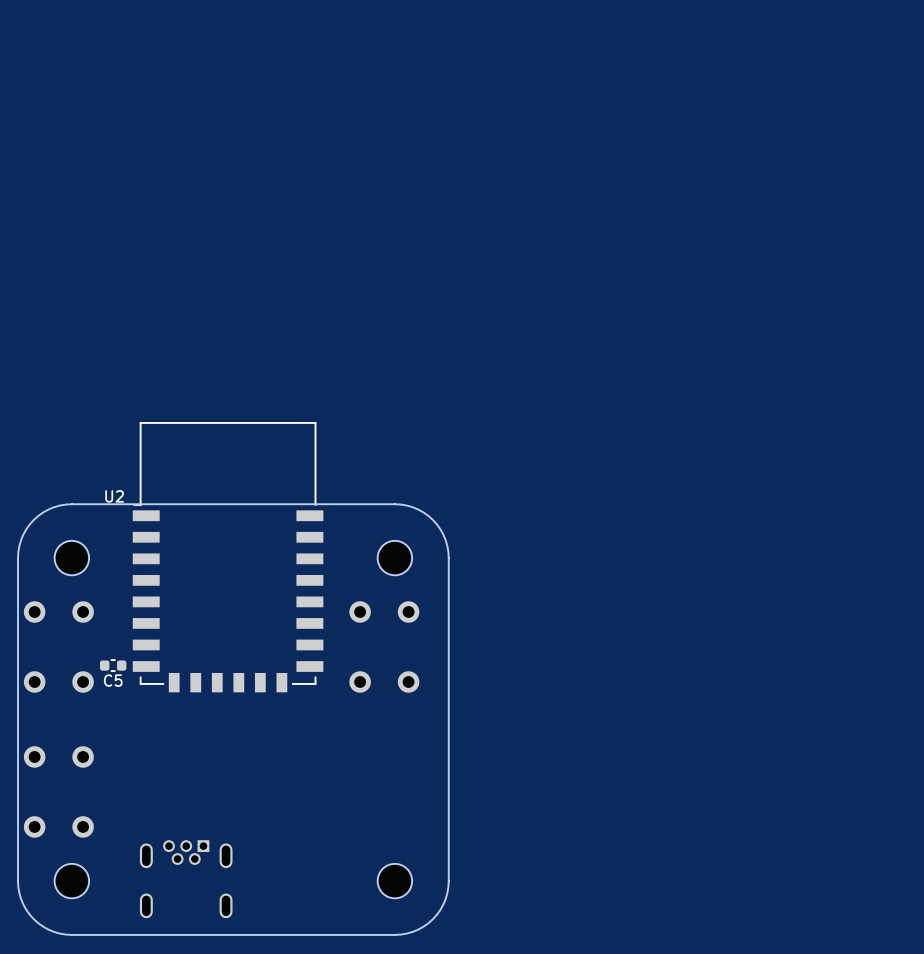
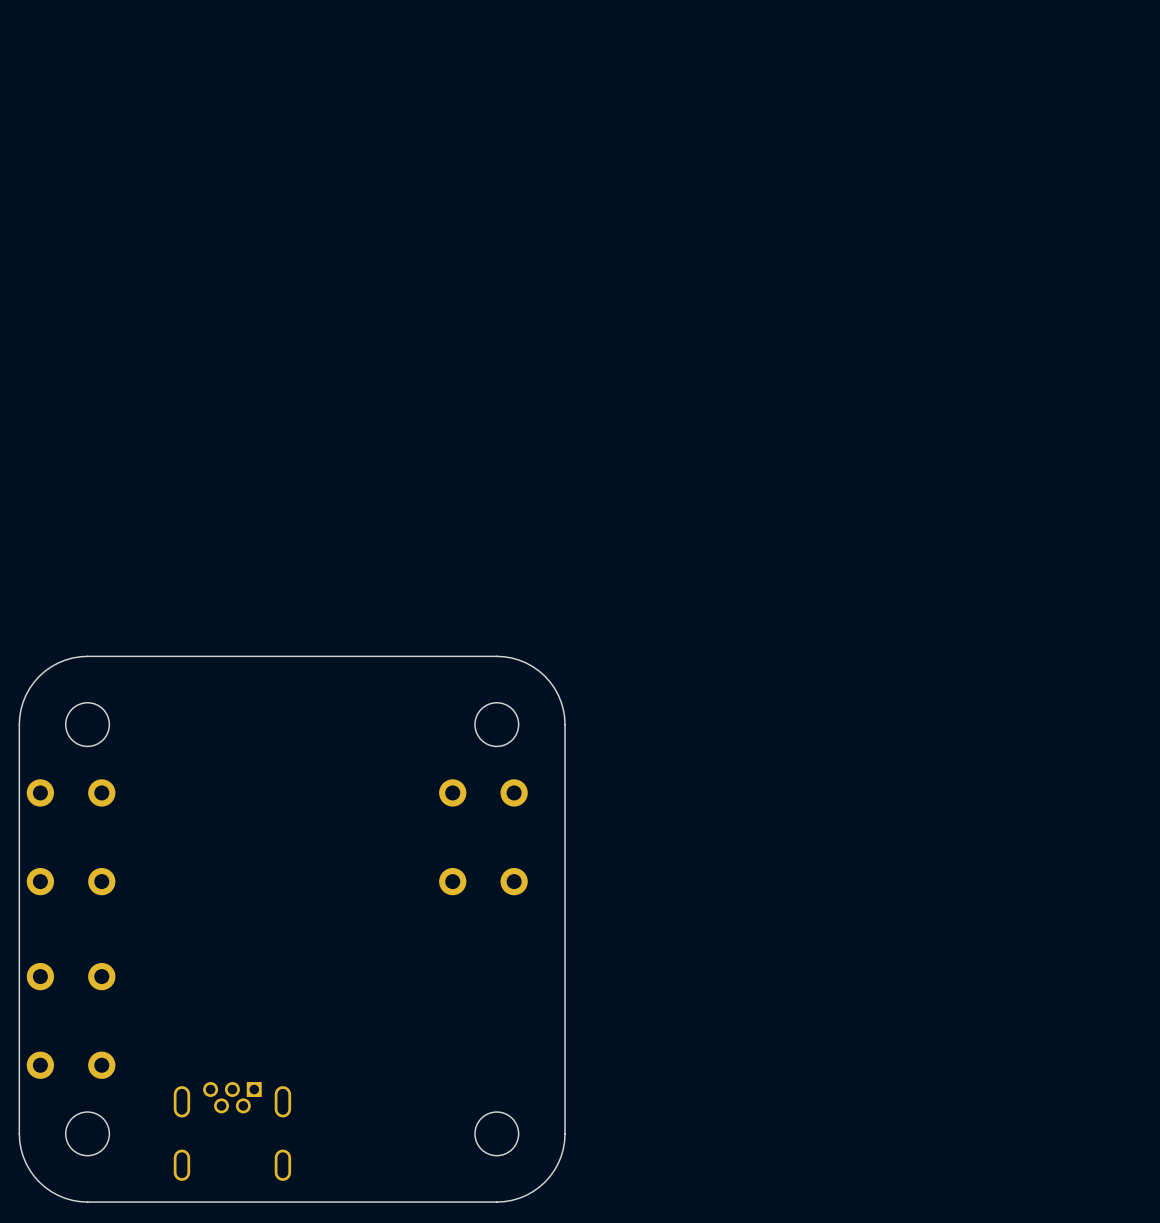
U2: (228, 557) -> none
C5: (113, 665) -> none

